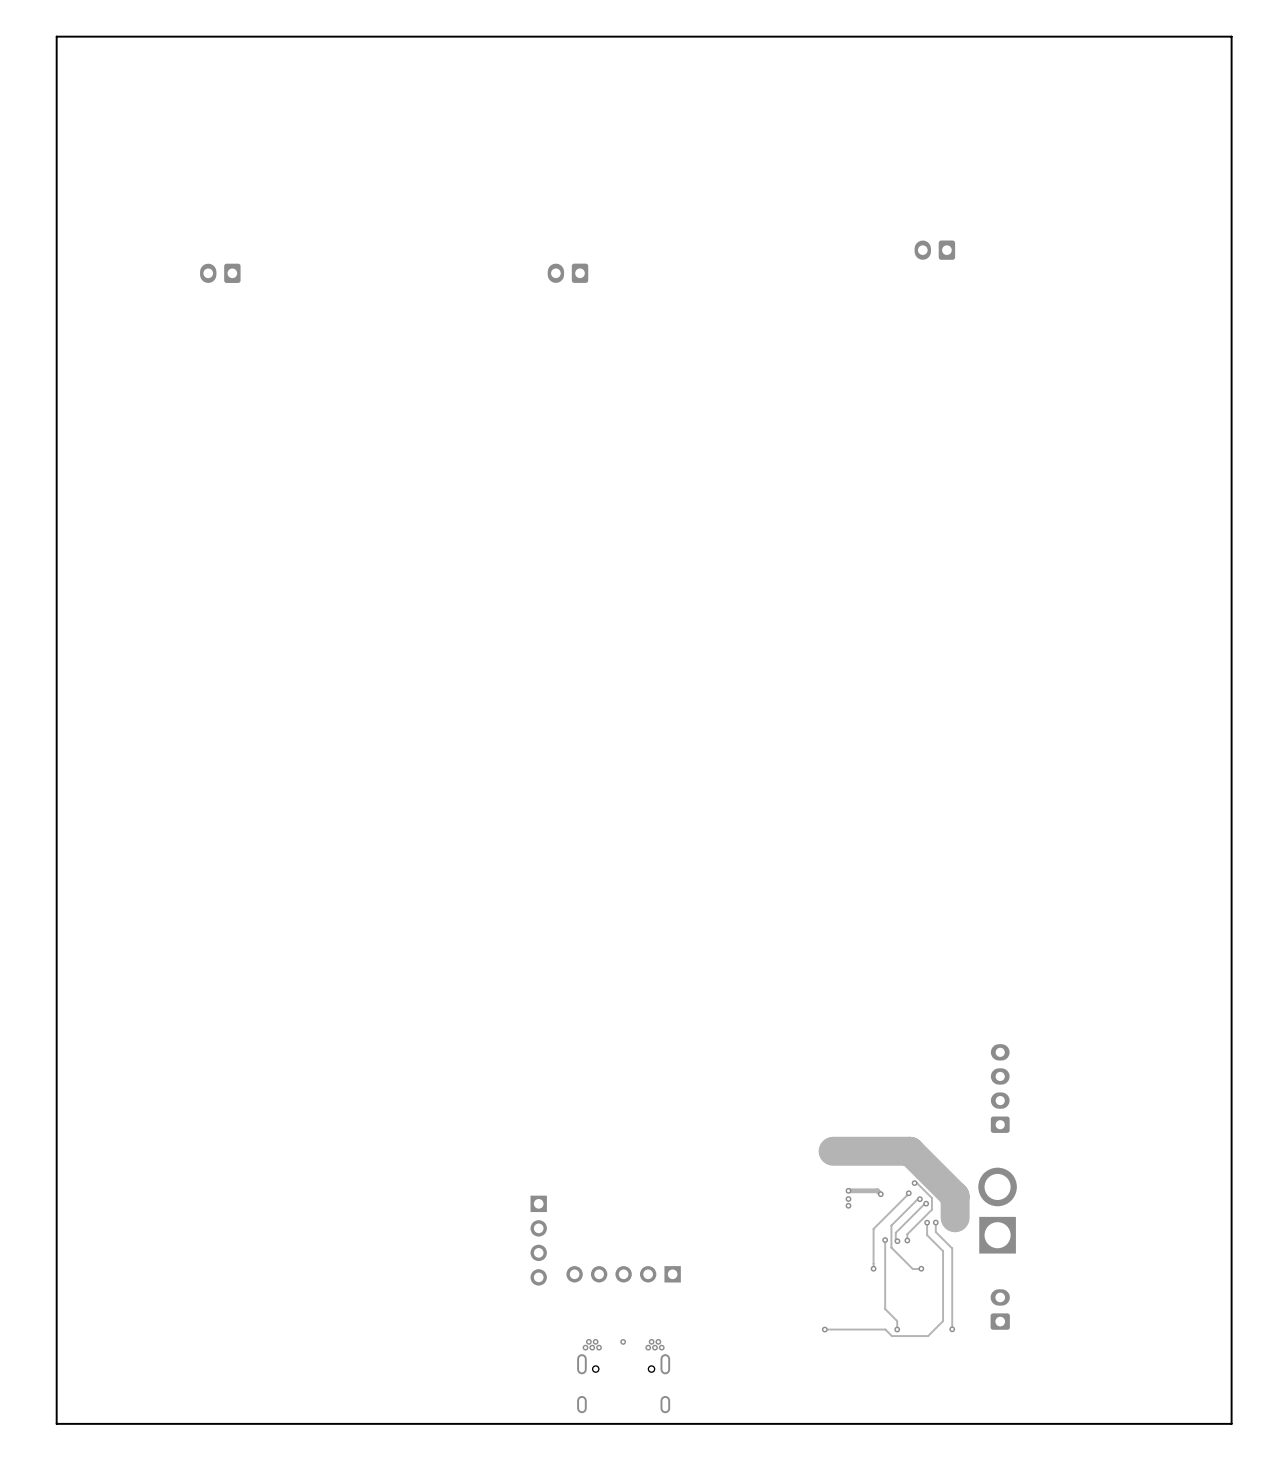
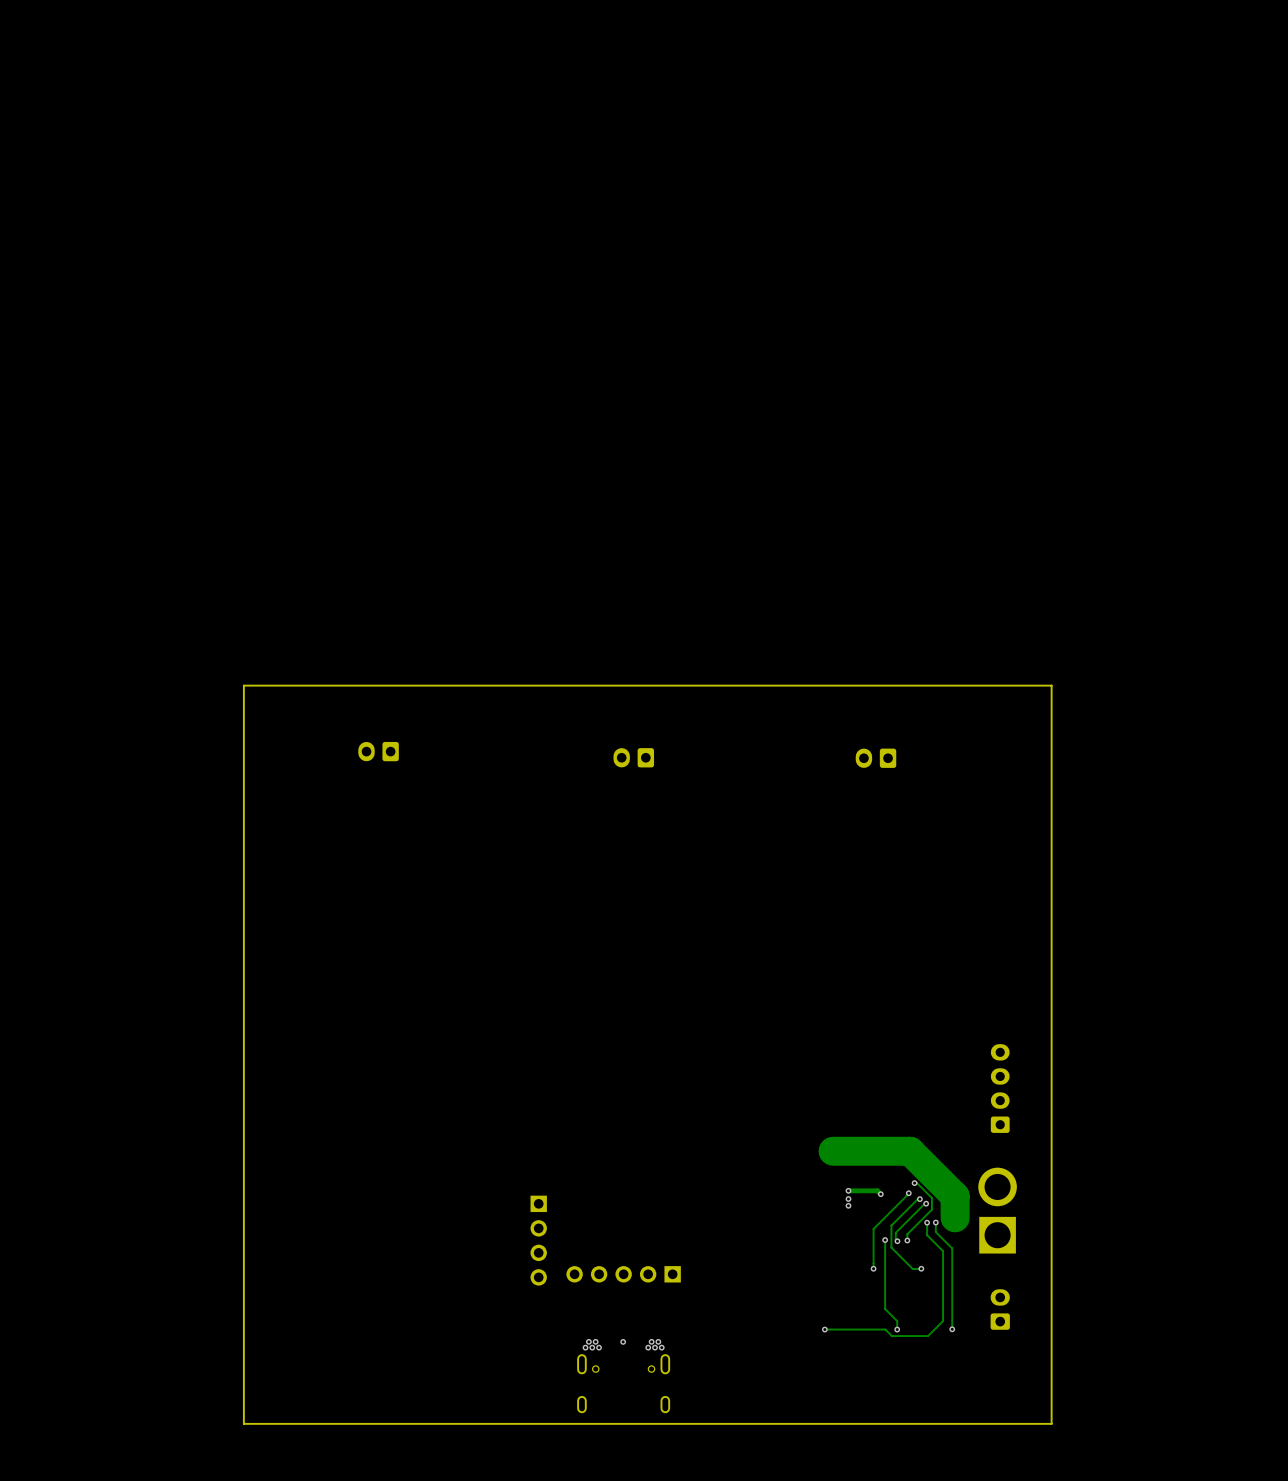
part: (934, 250) -> none
part: (220, 273) -> none
part: (567, 273) -> none
part: none -> (378, 751)
part: none -> (633, 757)
part: none -> (875, 758)
board edge: (1051, 1423) (1231, 1423) (1231, 36) (56, 36) (56, 1423) (243, 1423) -> (1051, 1423) (1051, 685) (243, 685) (243, 1423)

